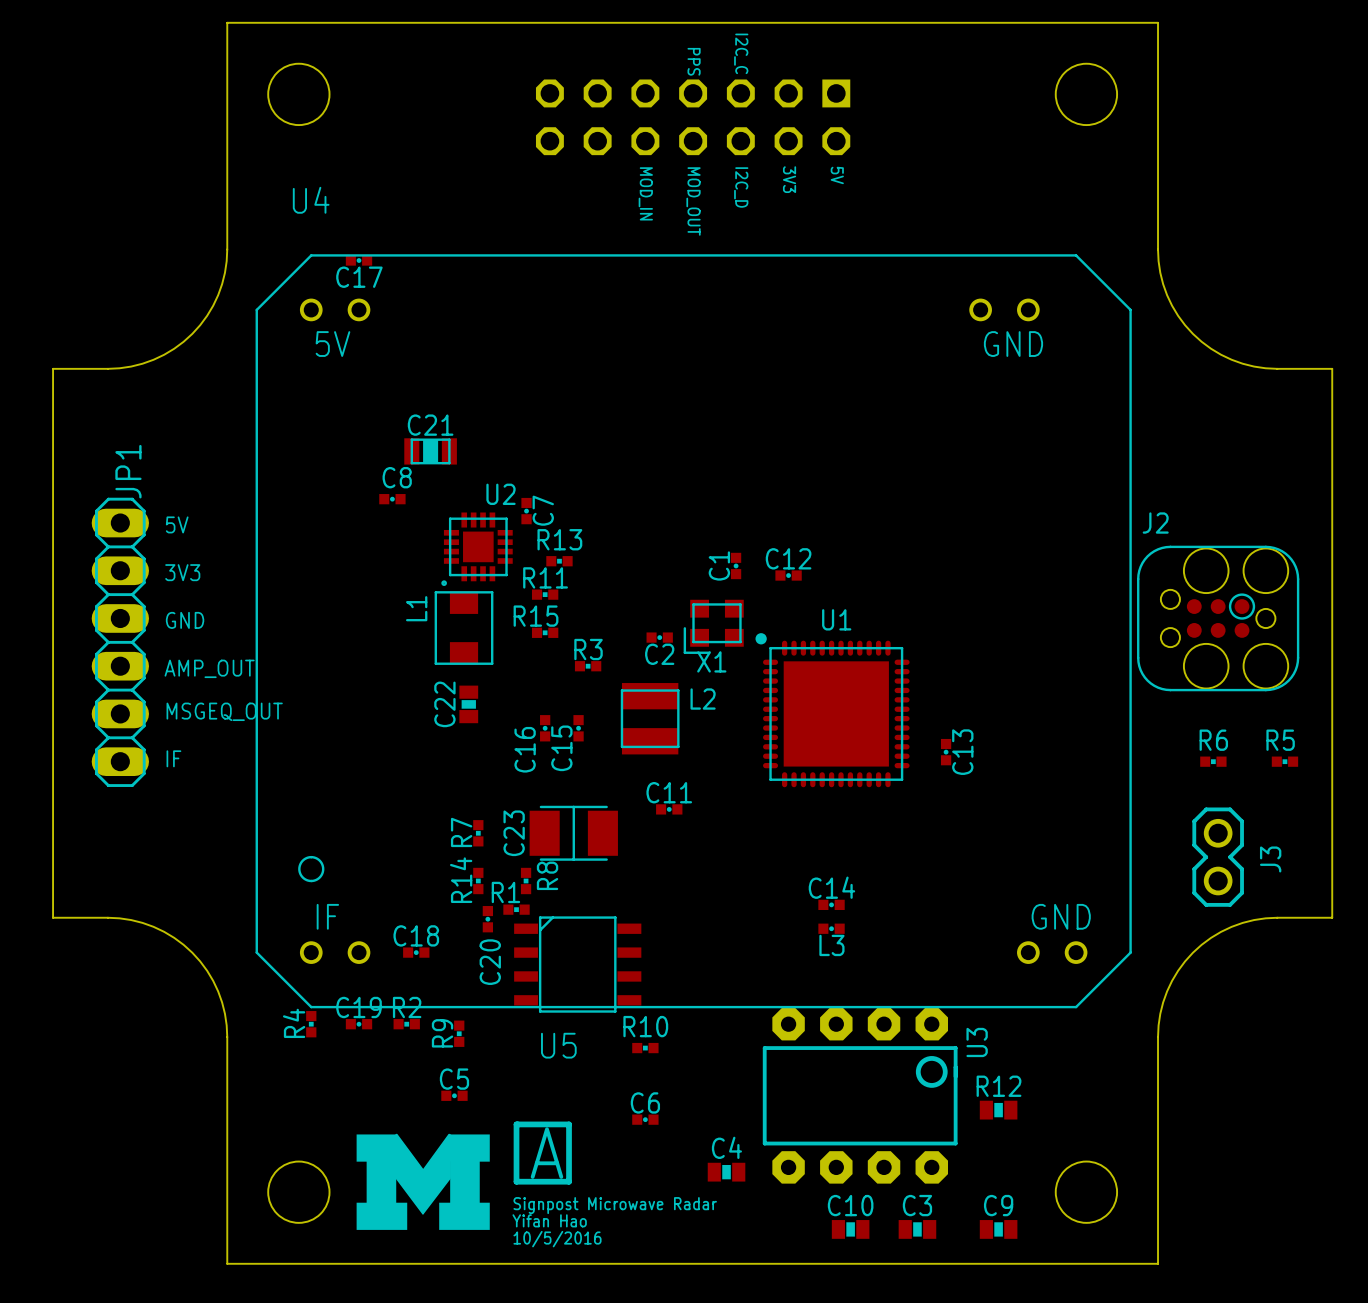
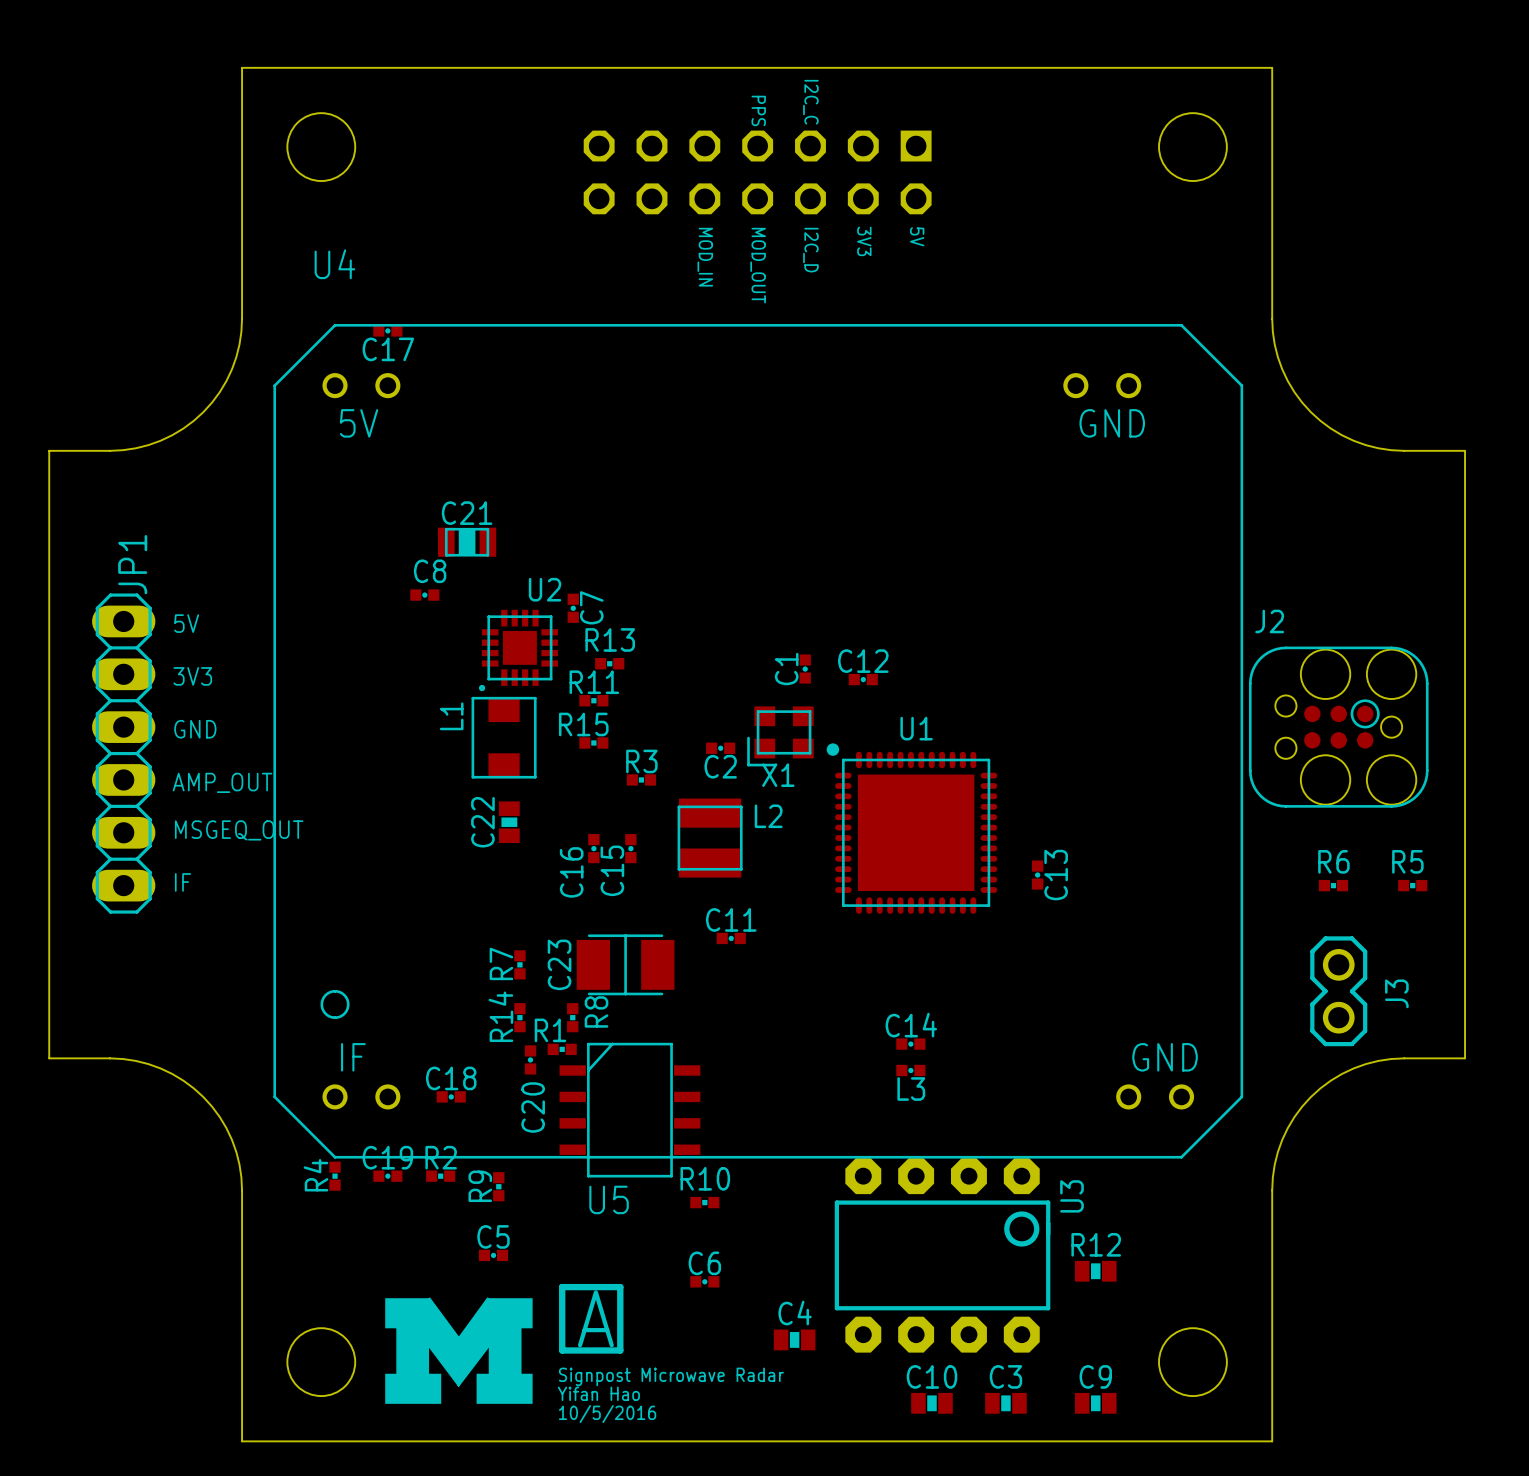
U5 footprint: [514, 916, 642, 1013] -> [559, 1042, 701, 1178]

